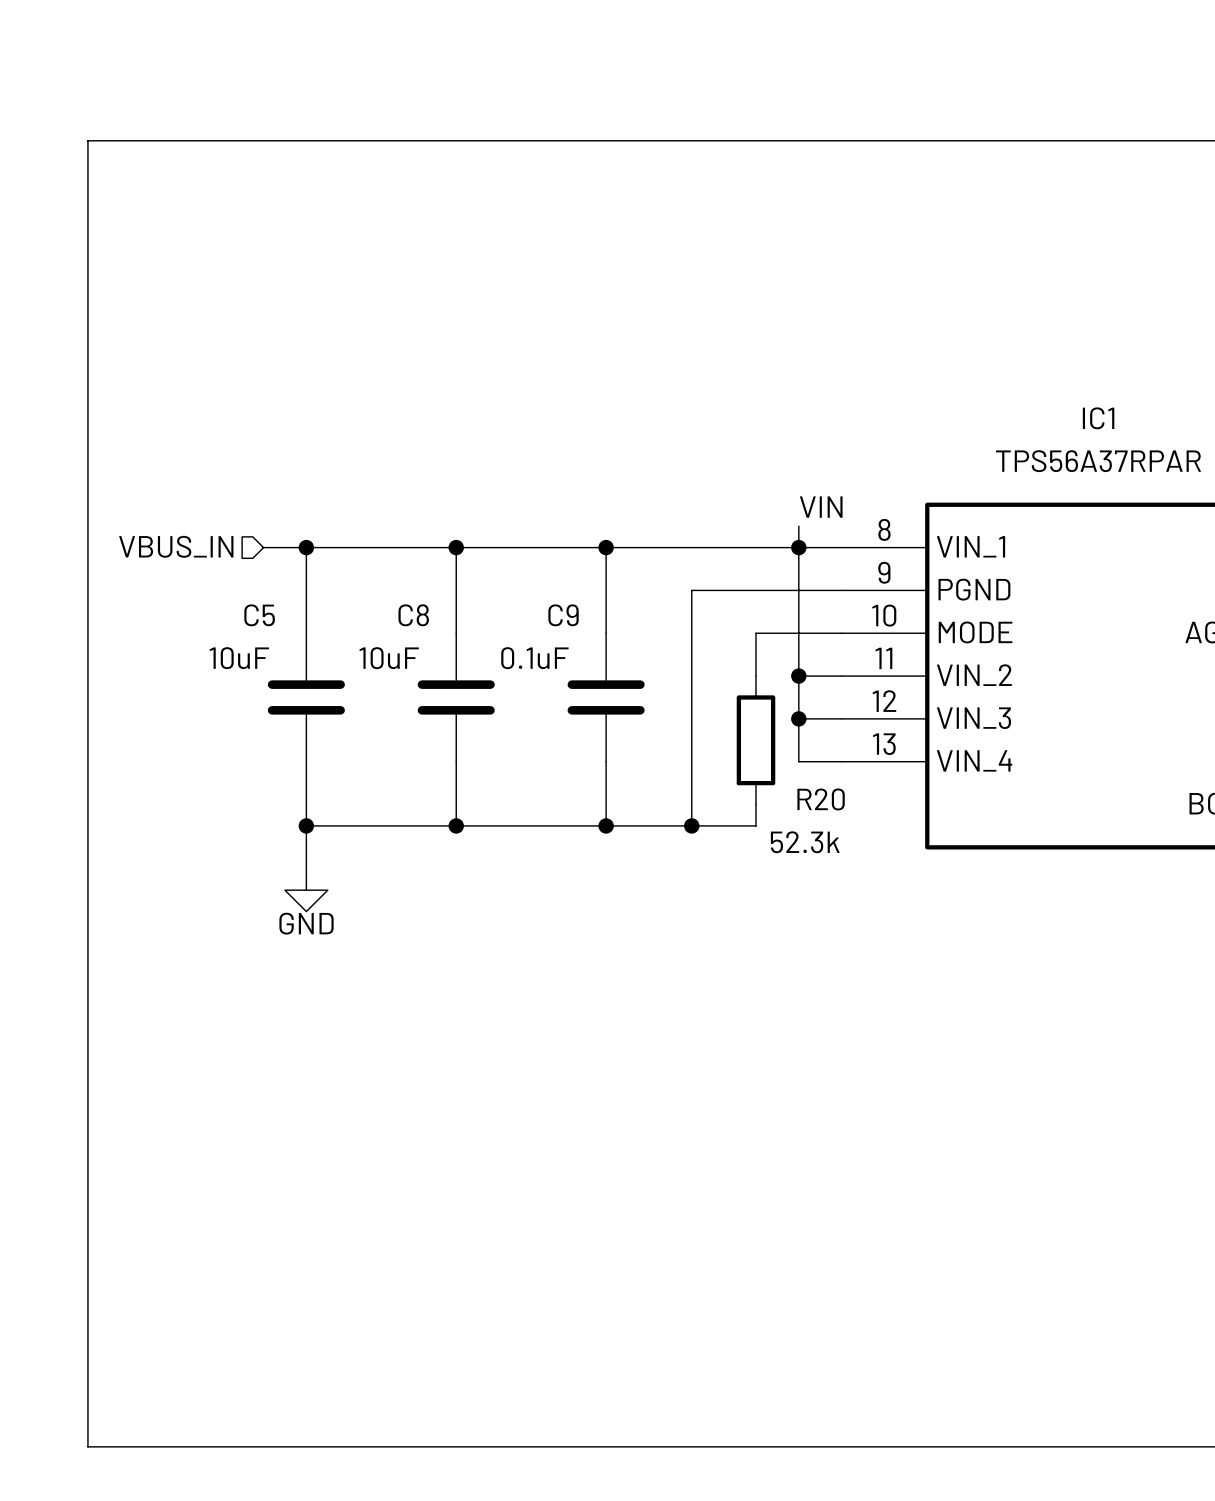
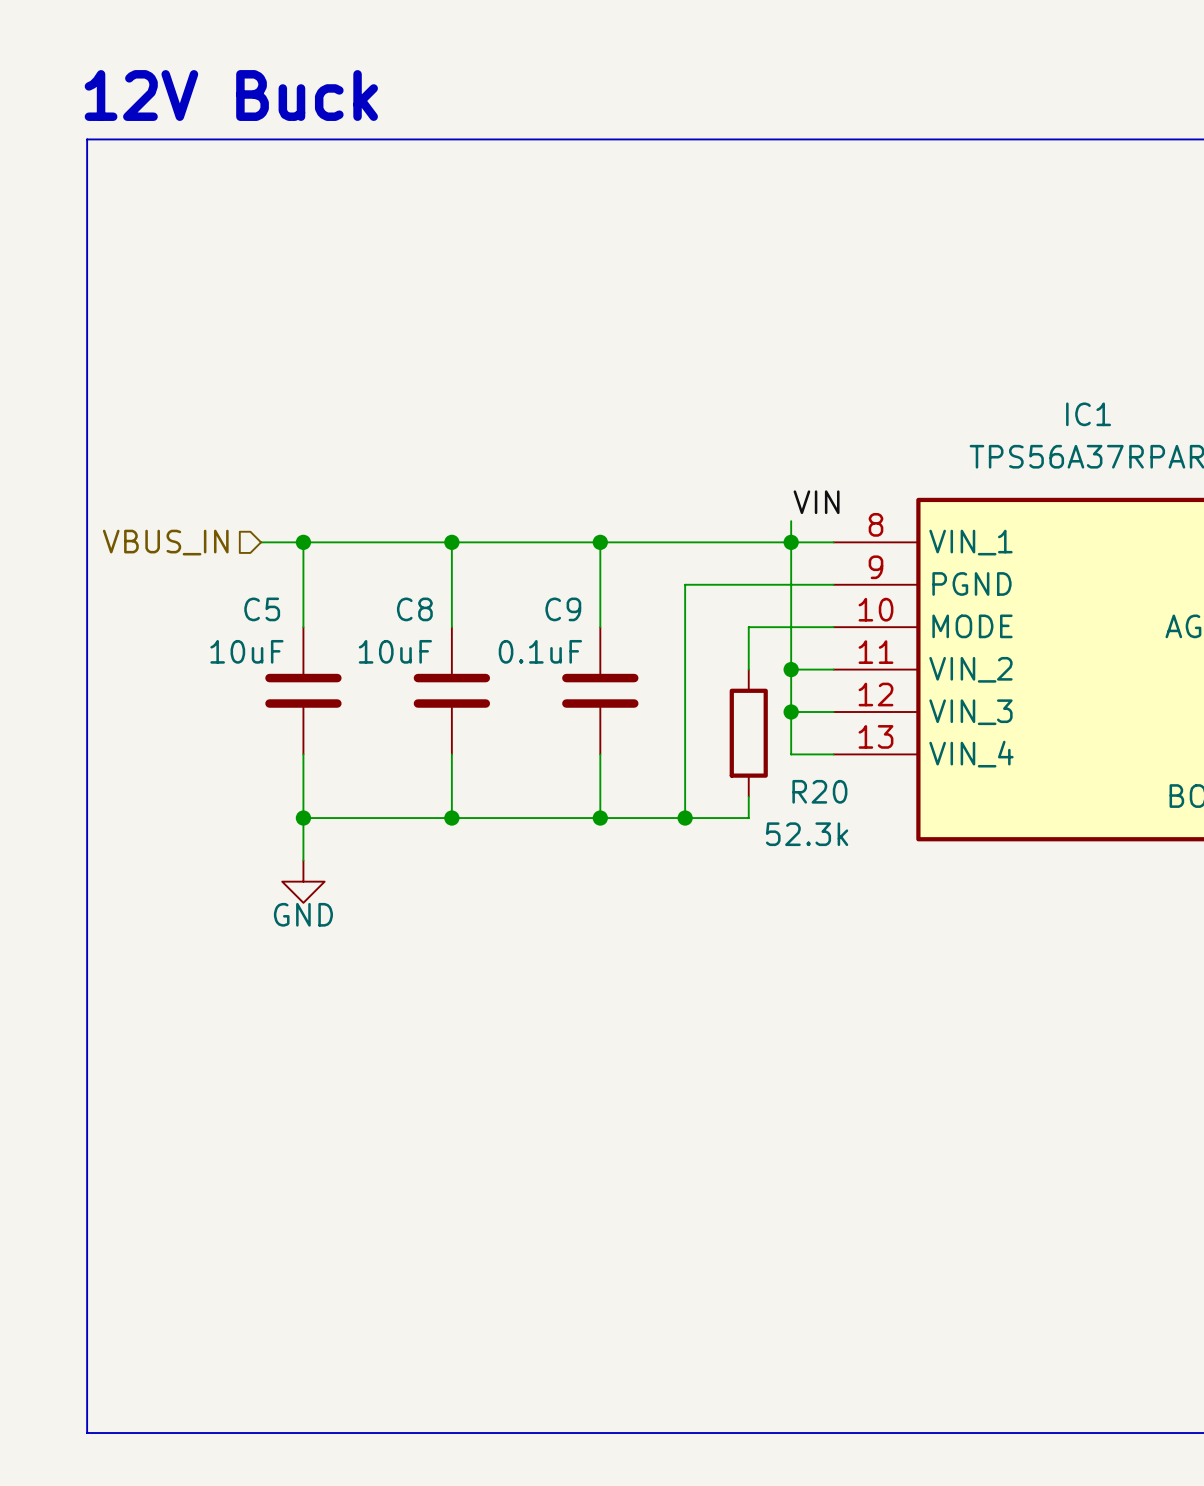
text: none -> 12V Buck (231, 95)

